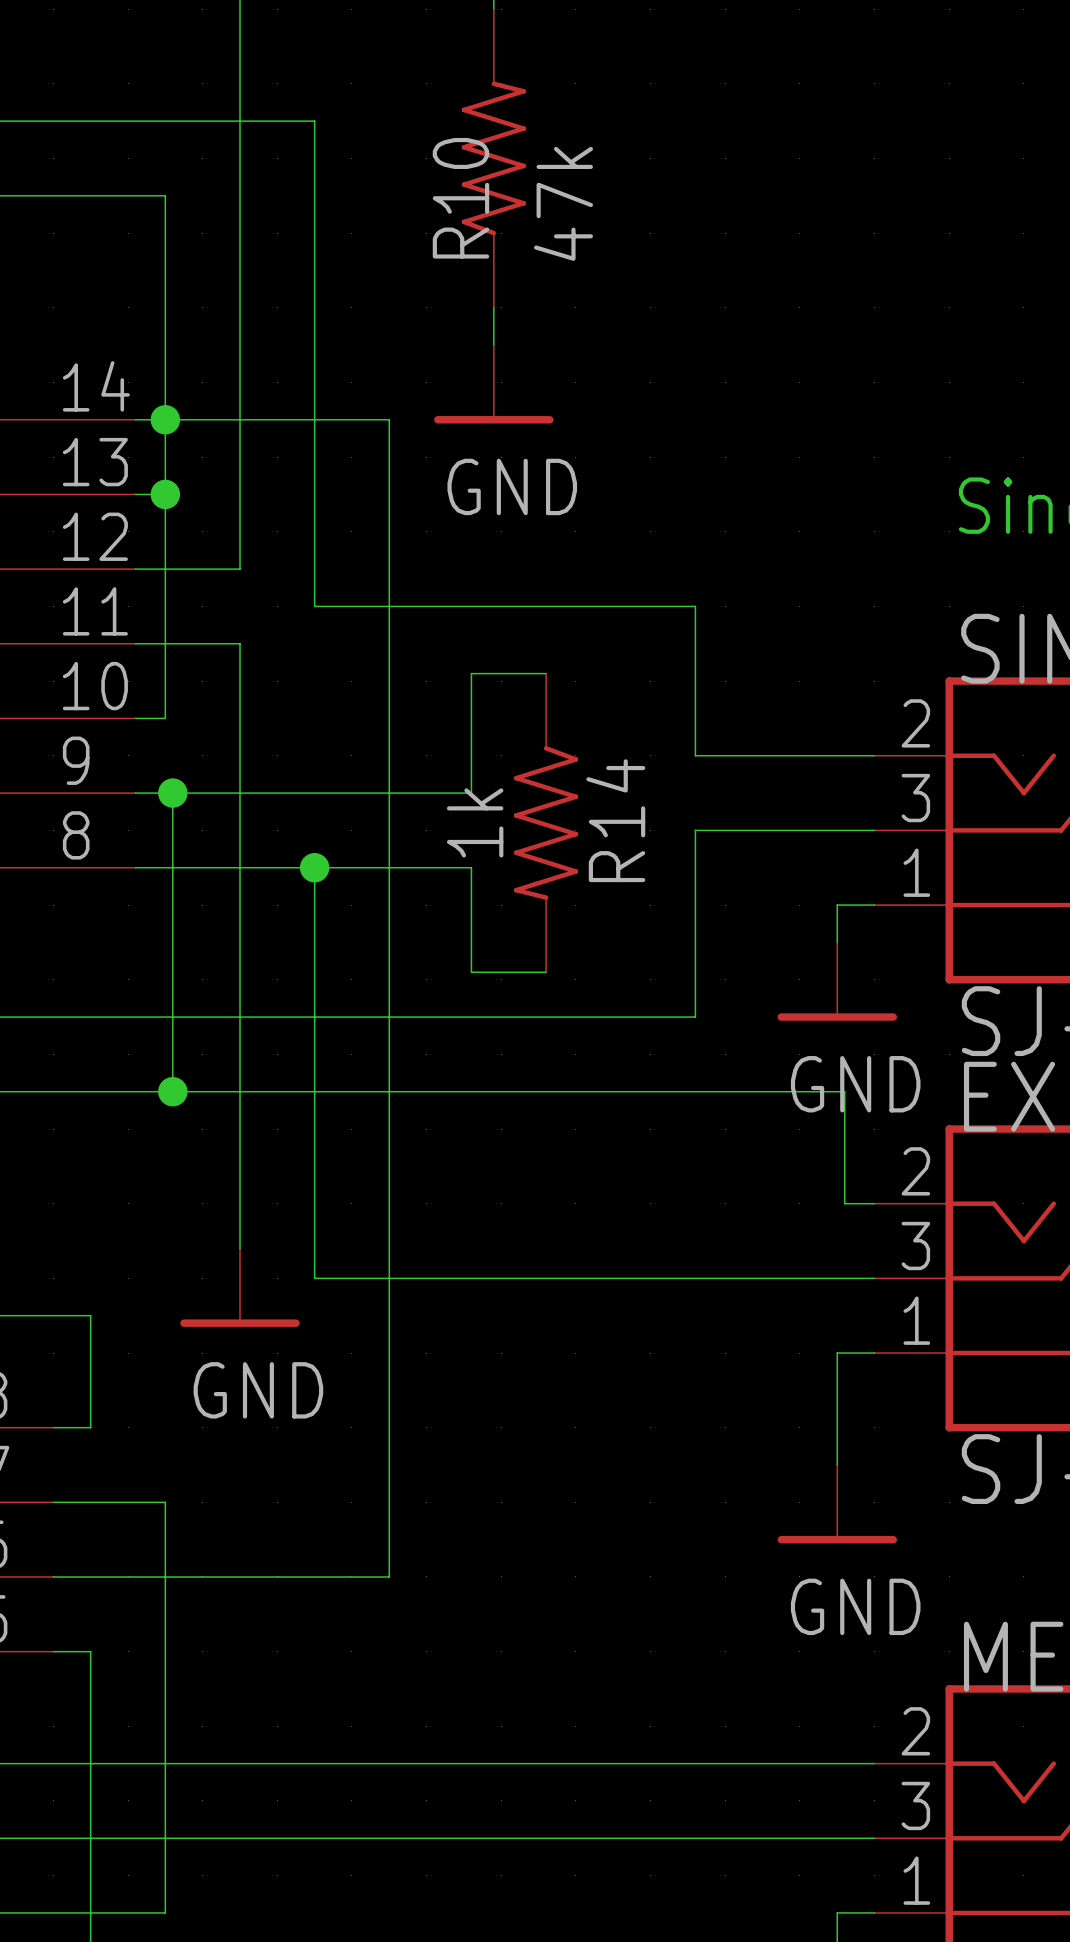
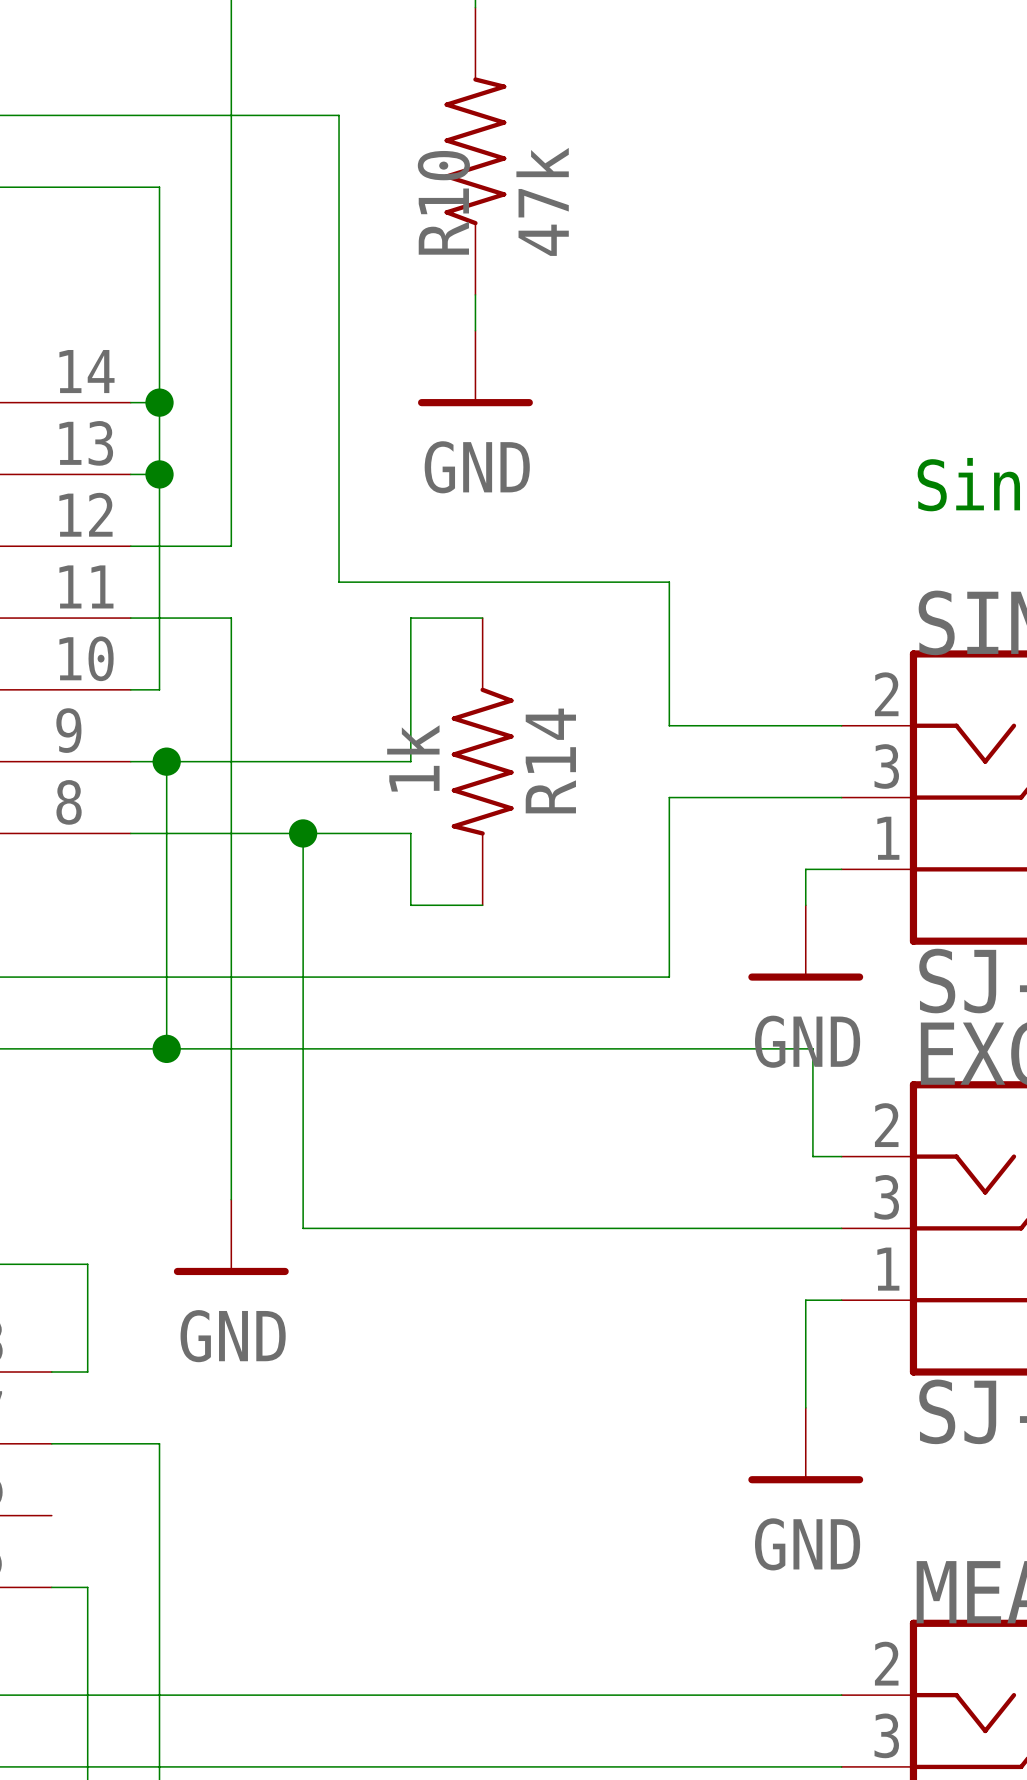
wire: (314, 121) (314, 606) (351, 606) -> (303, 115) (339, 115) (339, 582)
wire: (165, 419) (389, 419) (389, 1576) (53, 1576) -> none
wire: (546, 673) (471, 673) (471, 793) (426, 793) -> (482, 618) (410, 618) (410, 761)
R14 position: (546, 822) -> (482, 761)
wire: (426, 867) (471, 867) (471, 972) (546, 972) -> (410, 833) (410, 905) (482, 905)

